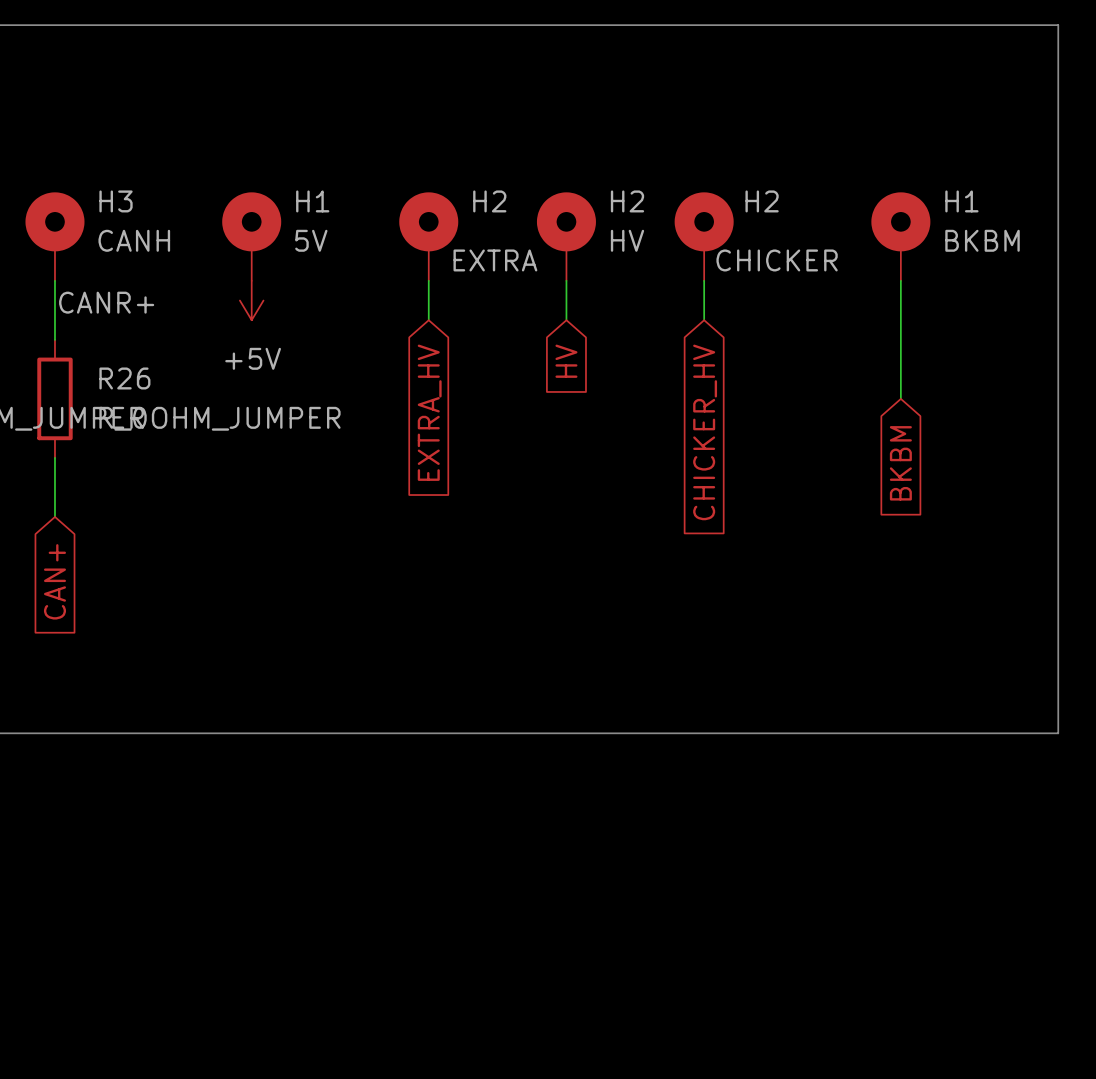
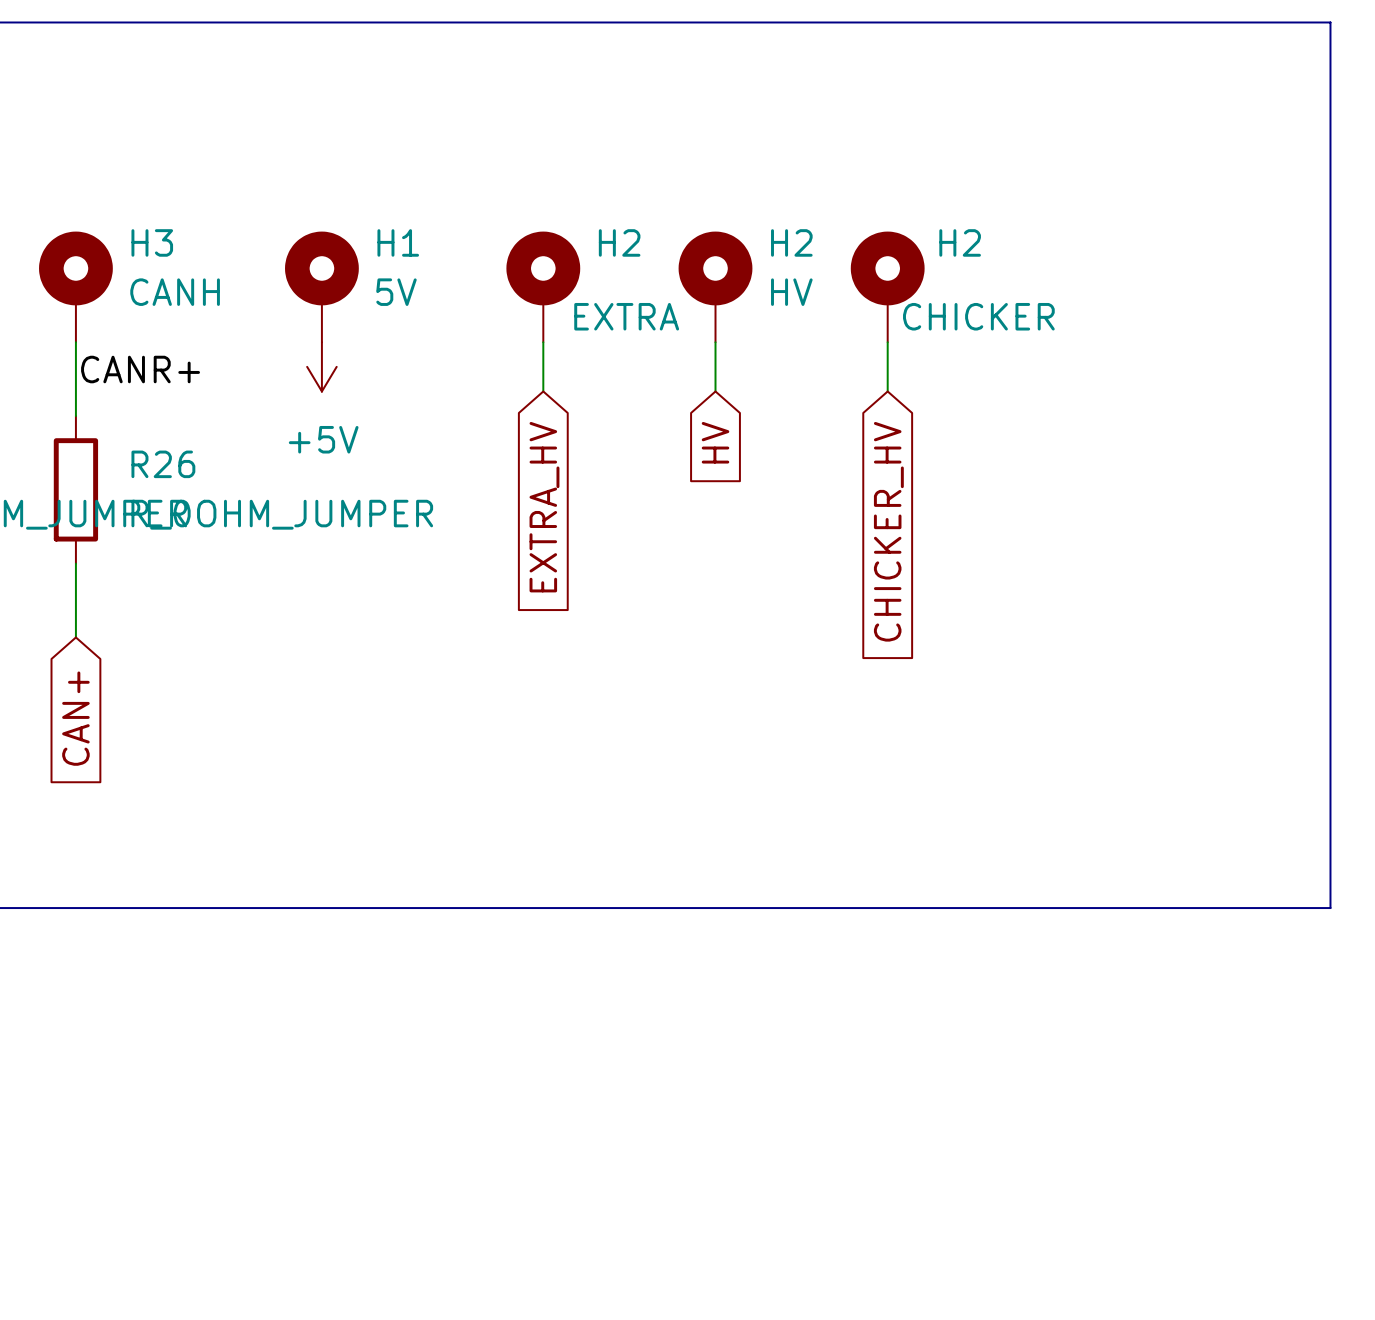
H1: BKBM (900, 236) -> none
wire: (900, 280) (900, 398) -> none
global label: BKBM (900, 463) -> none

